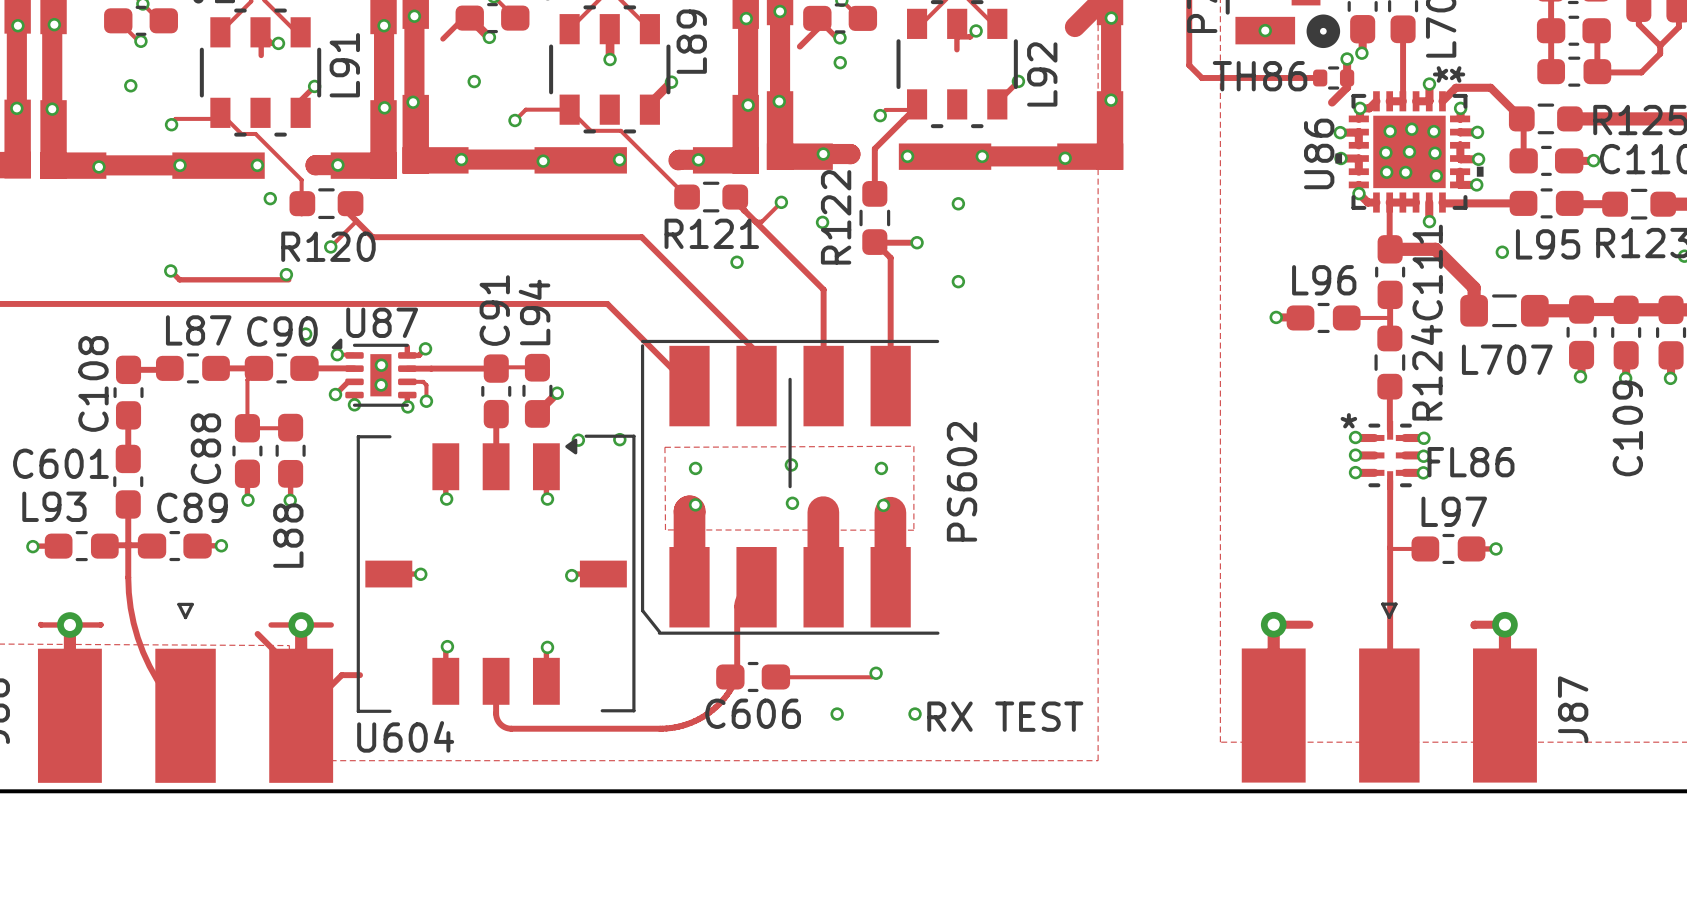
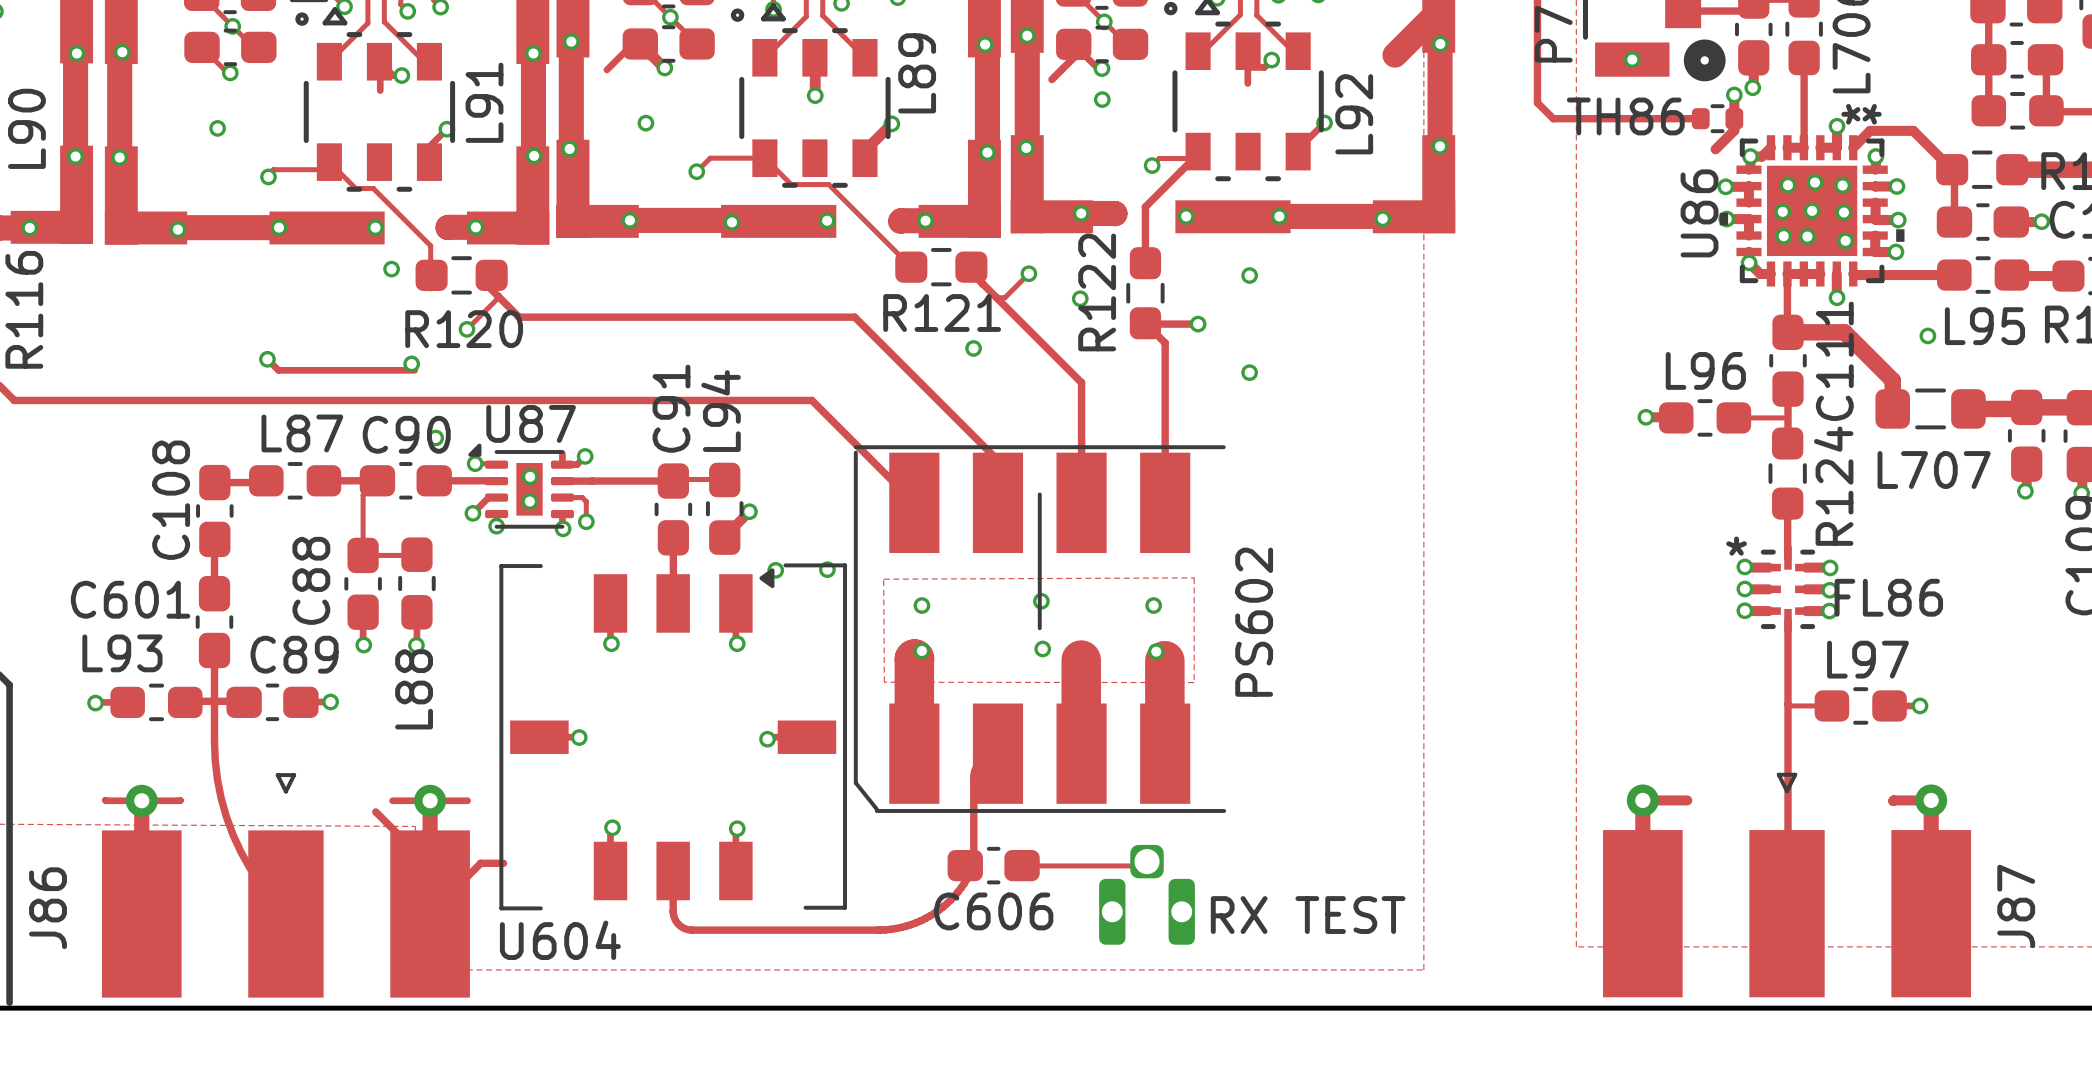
via: (876, 673) -> none
part: none -> (1147, 894)
via: (837, 714) -> none
via: (915, 714) -> none

